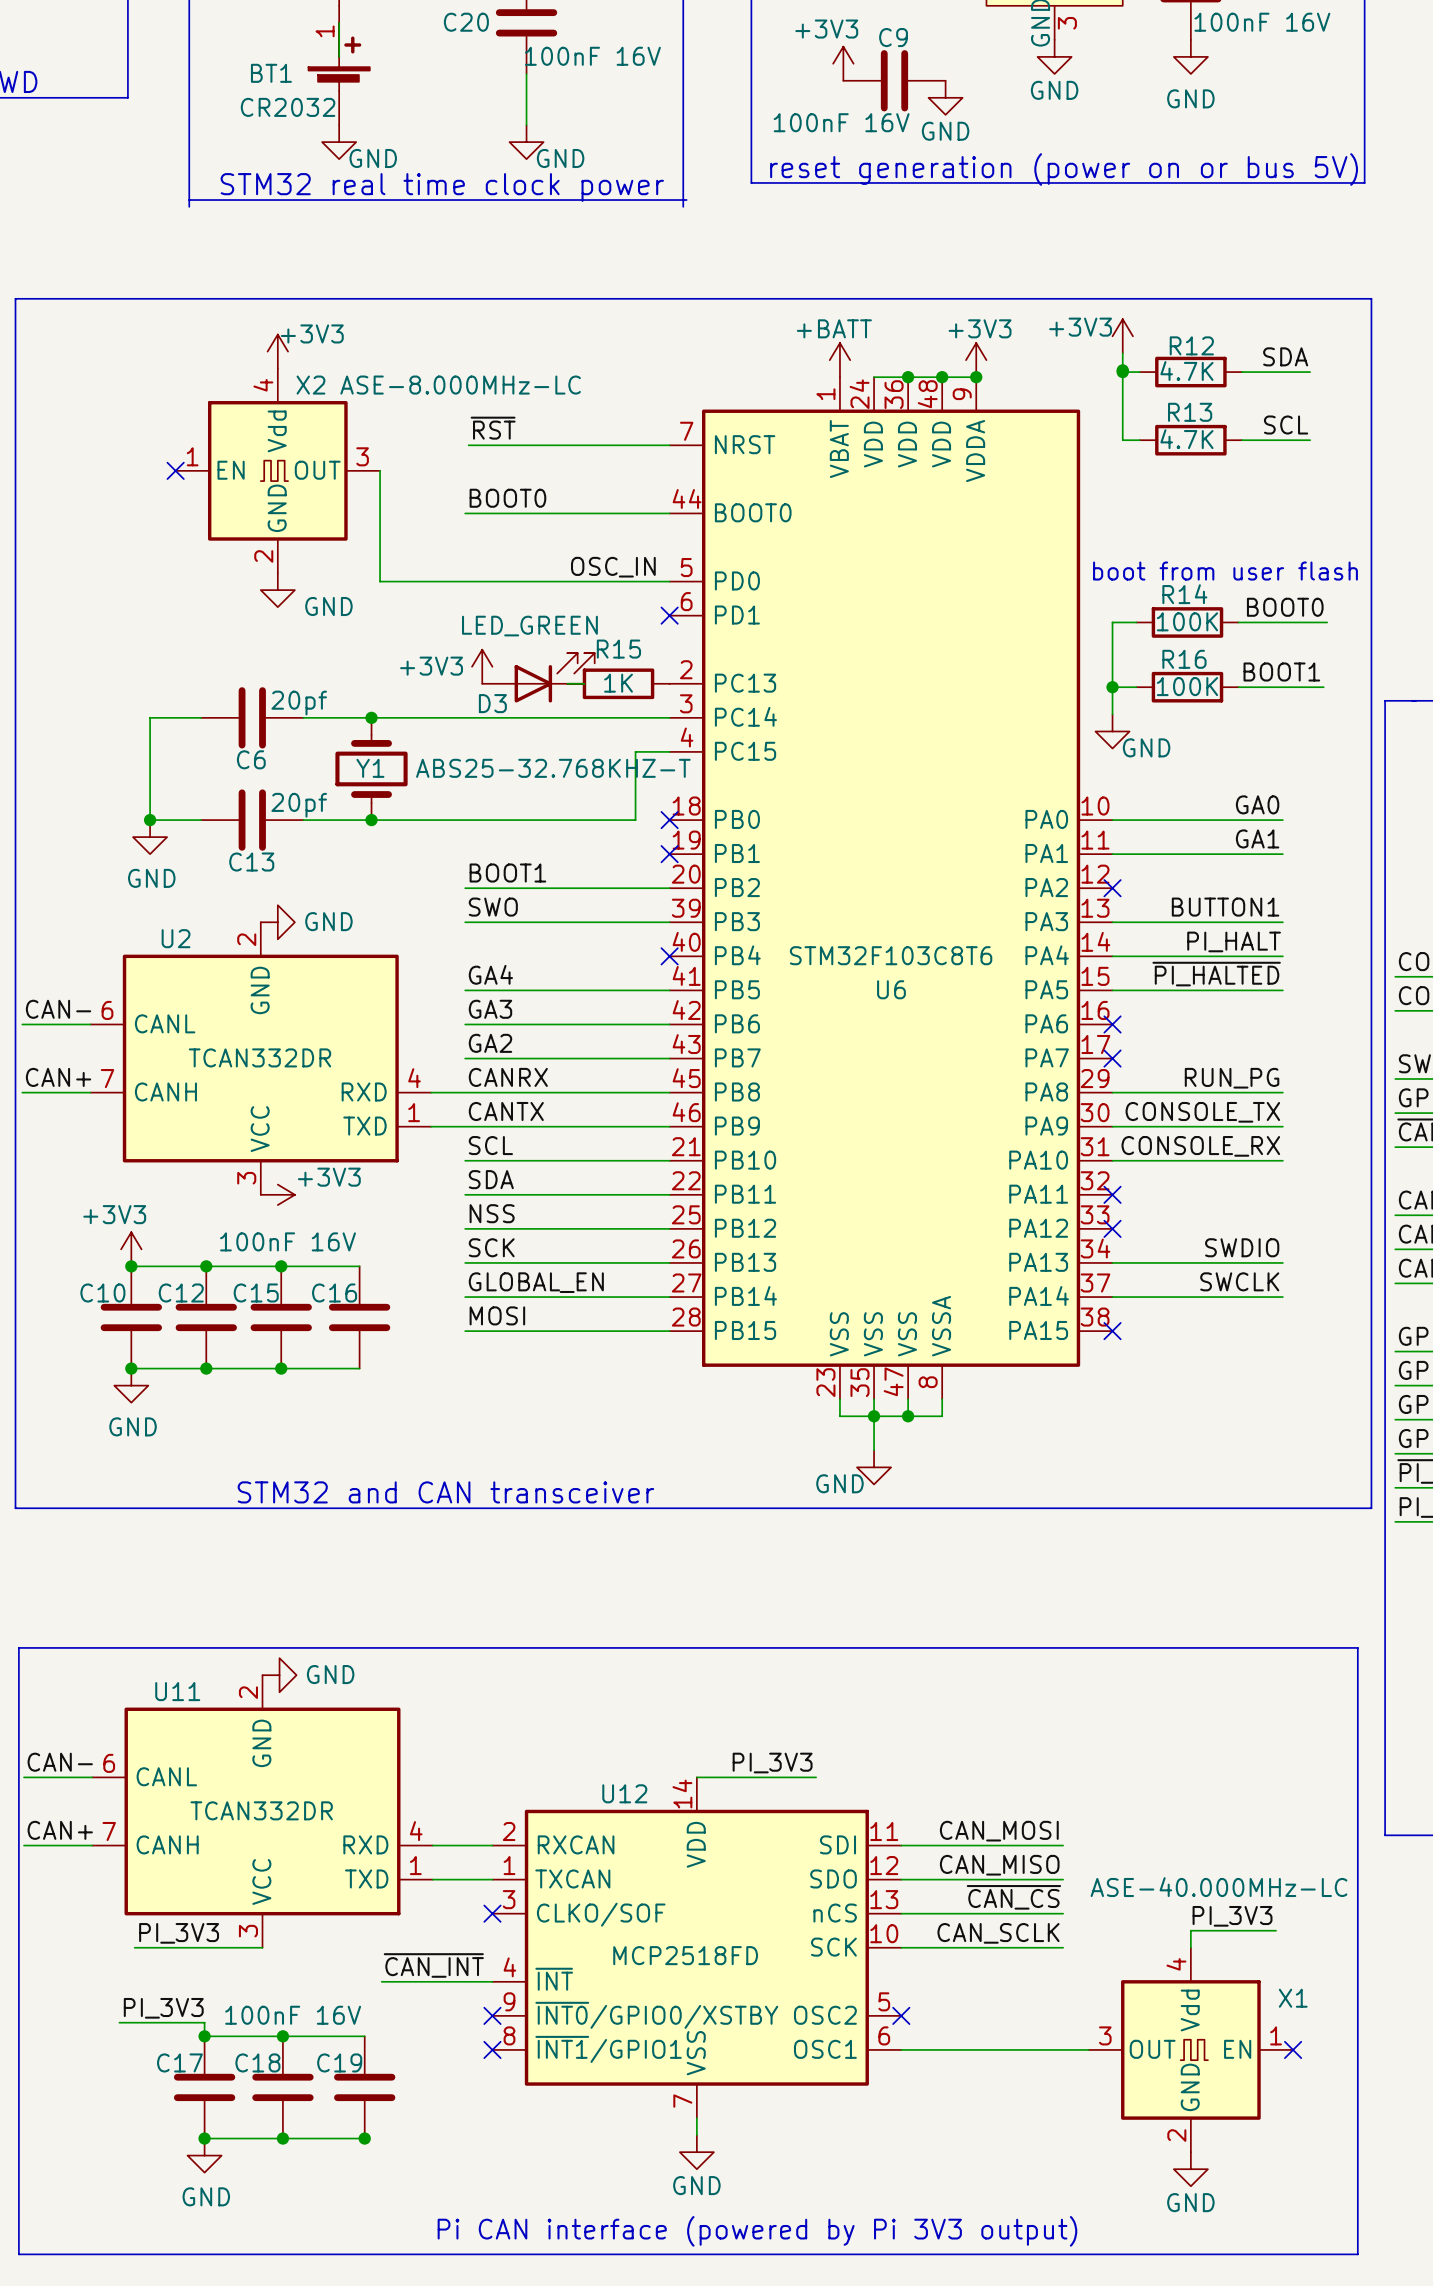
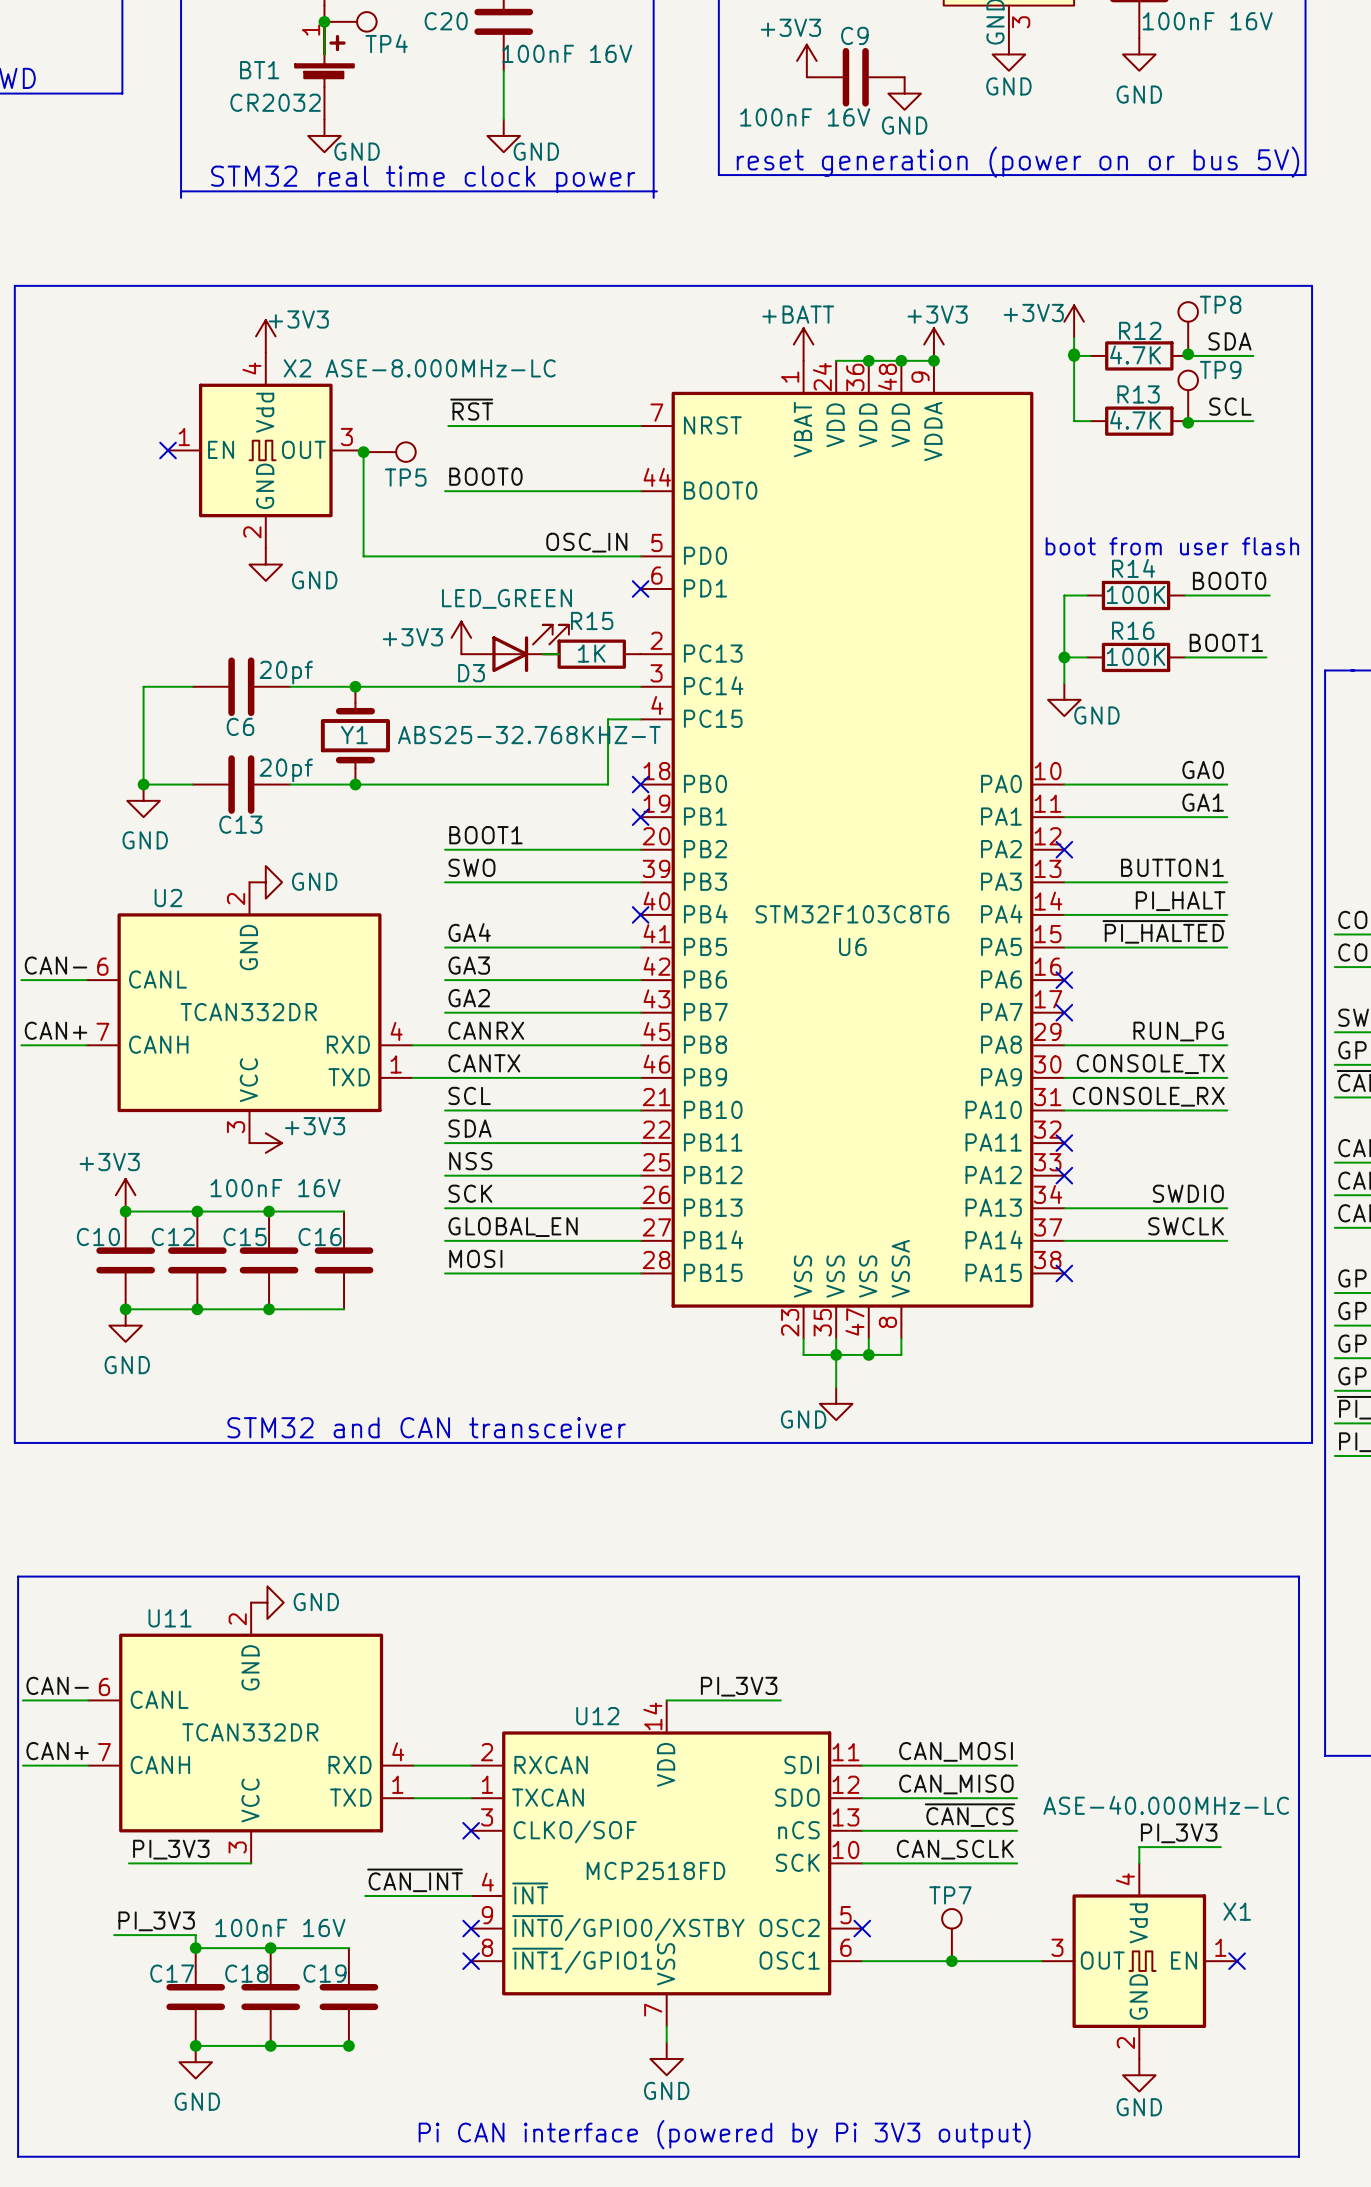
junction: none -> (324, 21)
TP4: none -> (350, 21)
TP8: none -> (1188, 328)
junction: none -> (1188, 354)
TP9: none -> (1188, 396)
junction: none -> (1188, 422)
junction: none -> (363, 452)
TP5: none -> (389, 452)
TP7: none -> (951, 1935)
junction: none -> (951, 1961)

